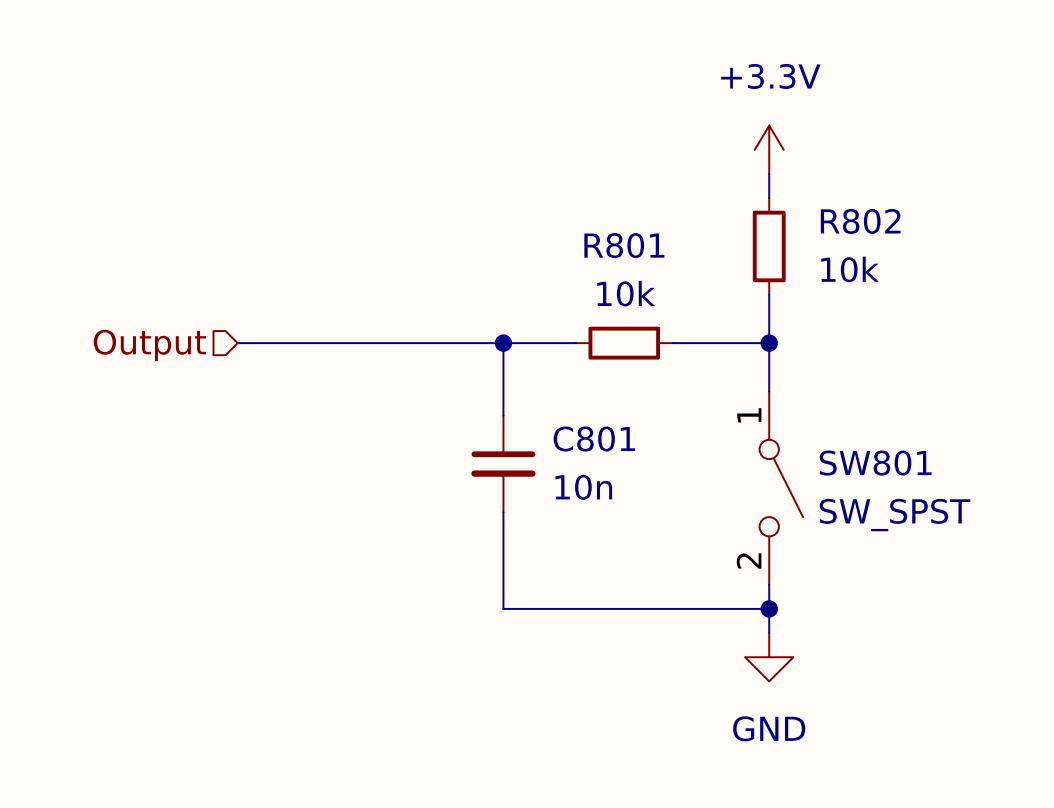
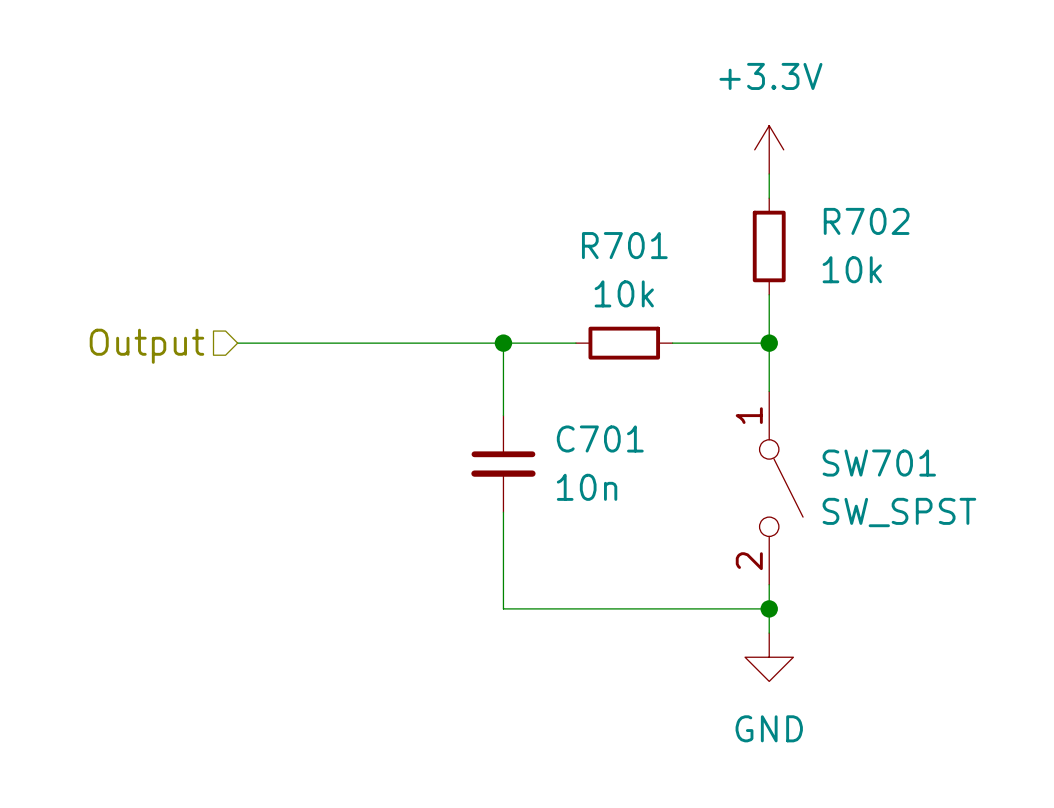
R802 name: R802 (860, 221) -> R702 (866, 221)
R801 name: R801 (624, 245) -> R701 (624, 245)
C801 name: C801 (594, 439) -> C701 (600, 439)
SW801 name: SW801 (875, 463) -> SW701 (879, 463)

